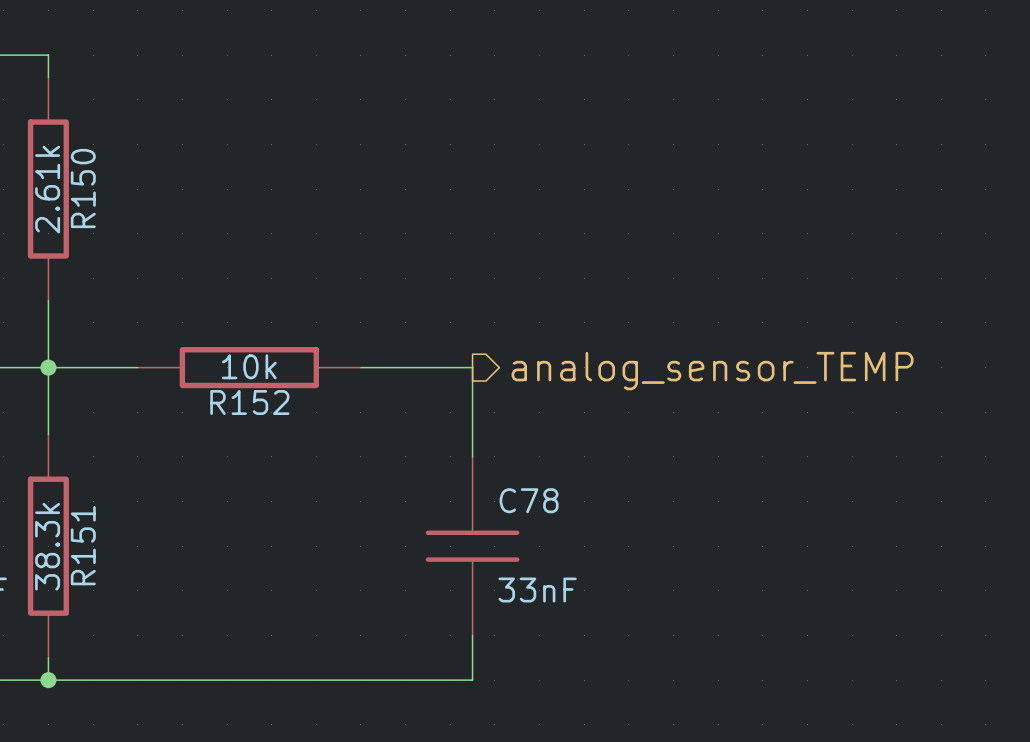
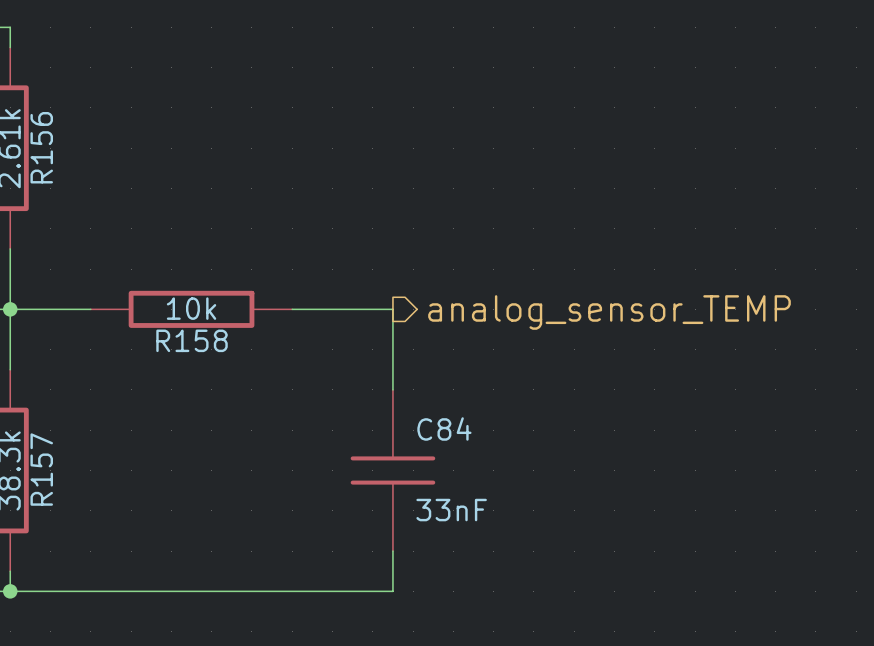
R150 name: R150 (83, 188) -> R156 (41, 147)
R152 name: R152 (249, 402) -> R158 (192, 340)
C78 name: C78 (529, 500) -> C84 (444, 428)
R151 name: R151 (83, 545) -> R157 (41, 469)

